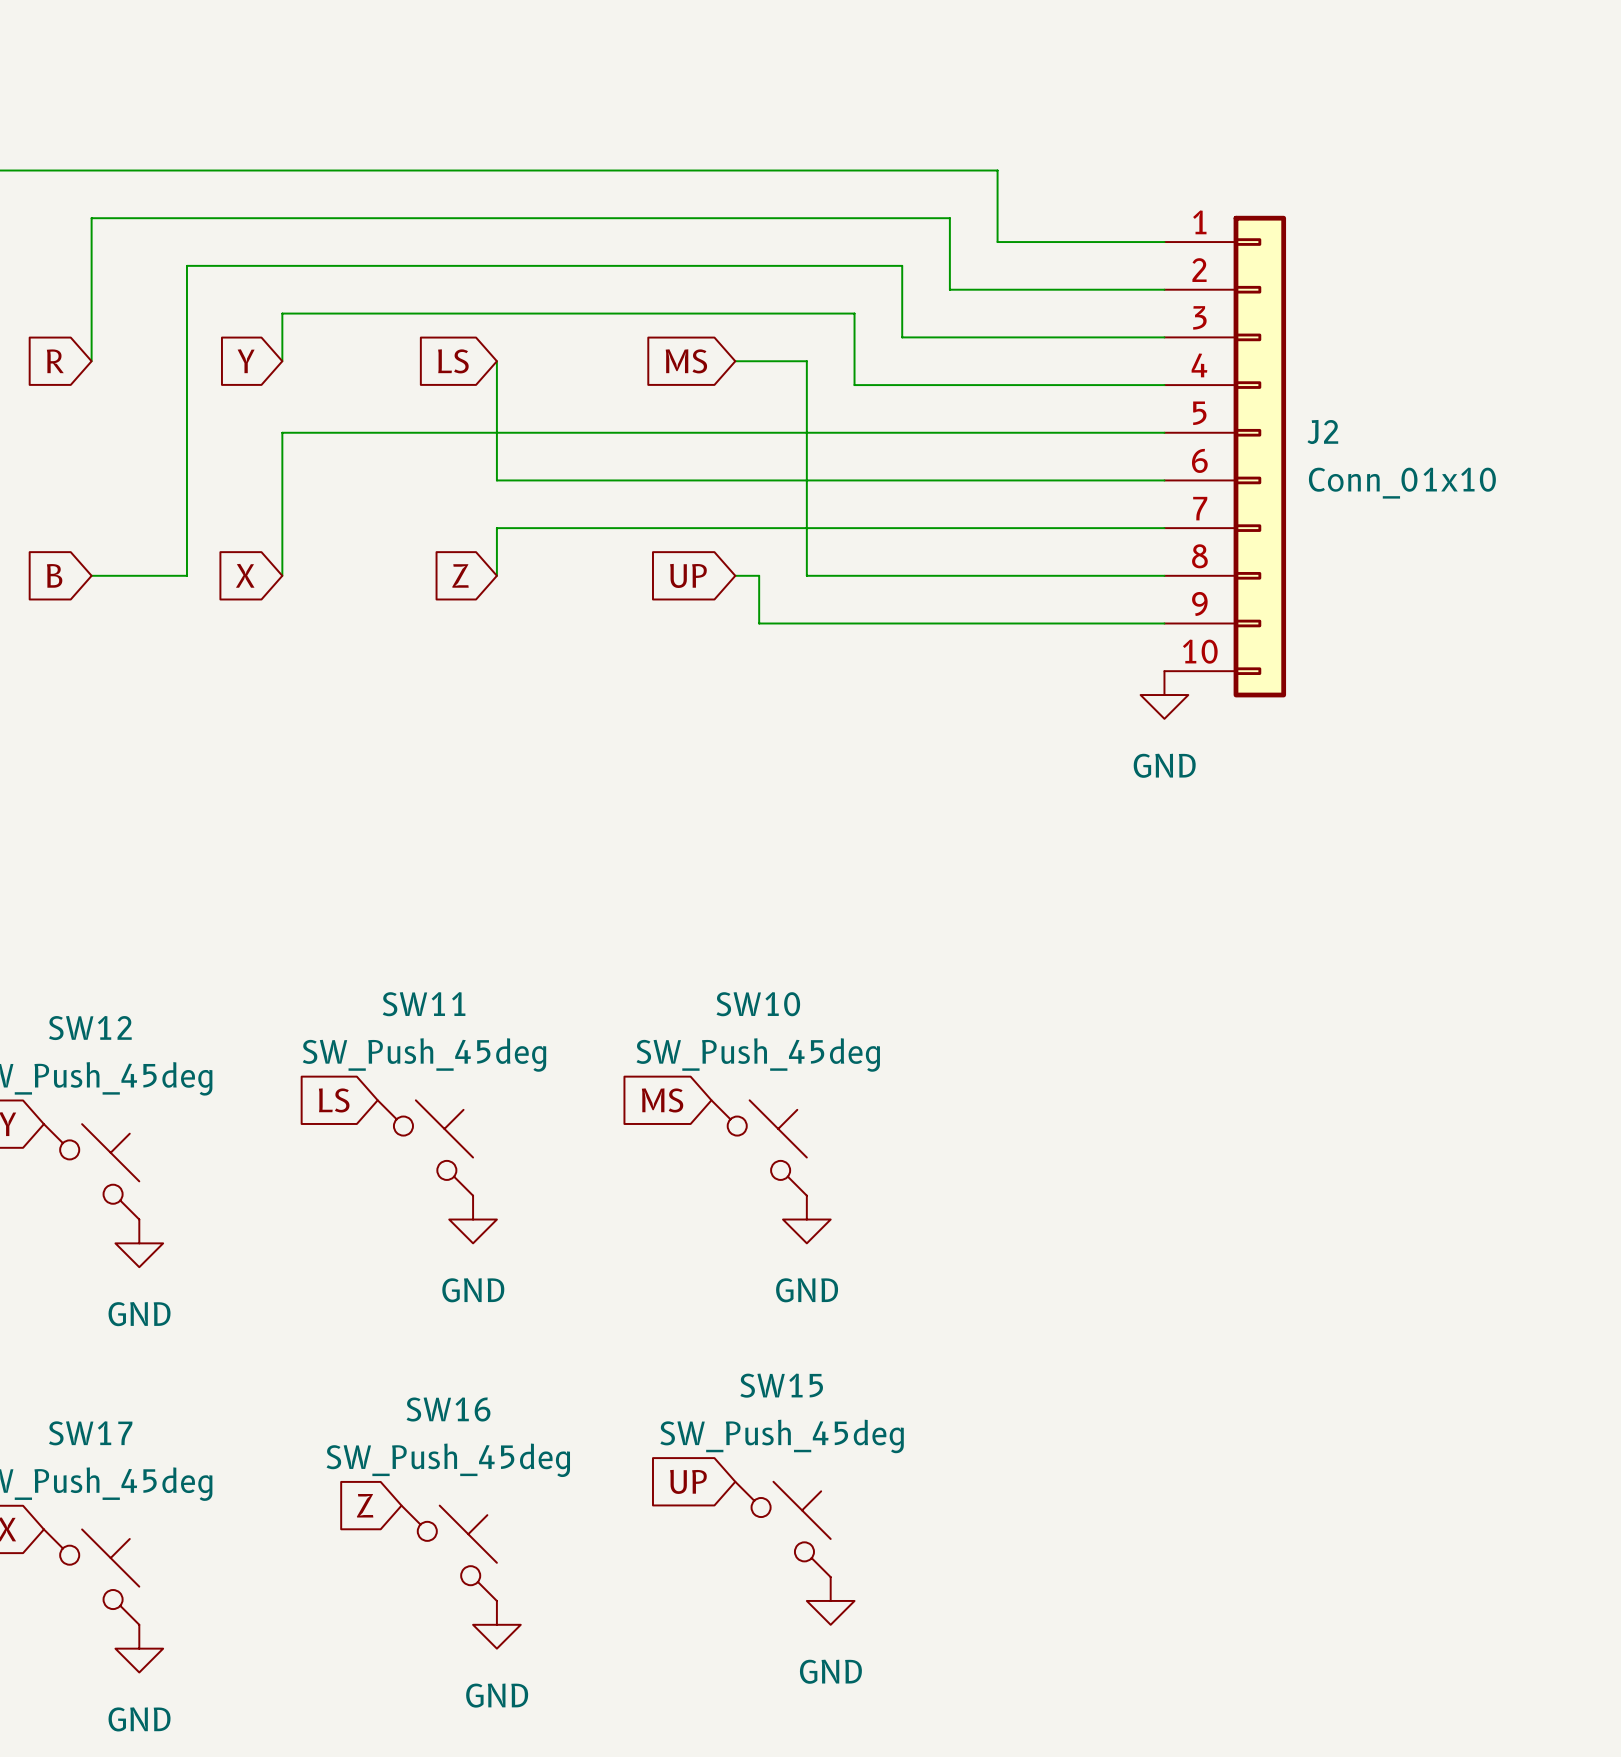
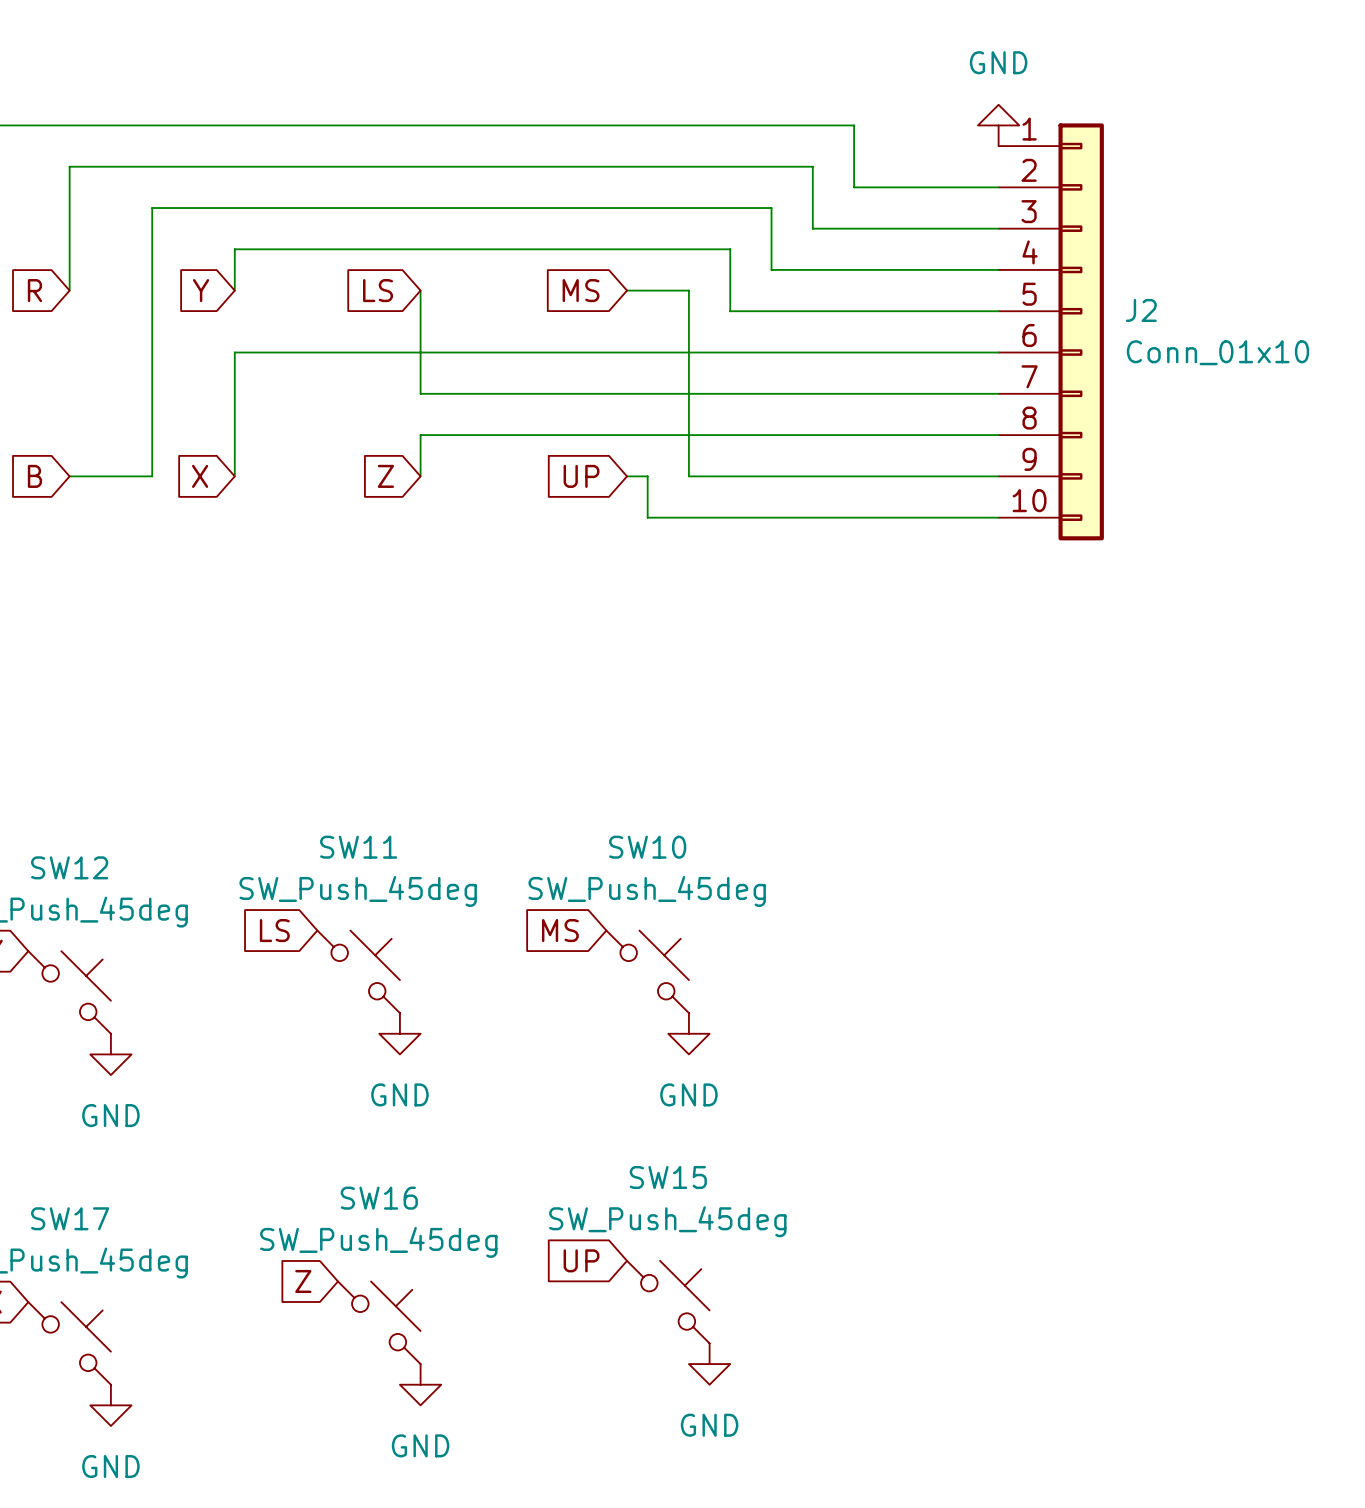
power symbol: none -> GND (998, 125)
J2 position: (1225, 456) -> (1051, 331)
power symbol: GND (1164, 695) -> none

